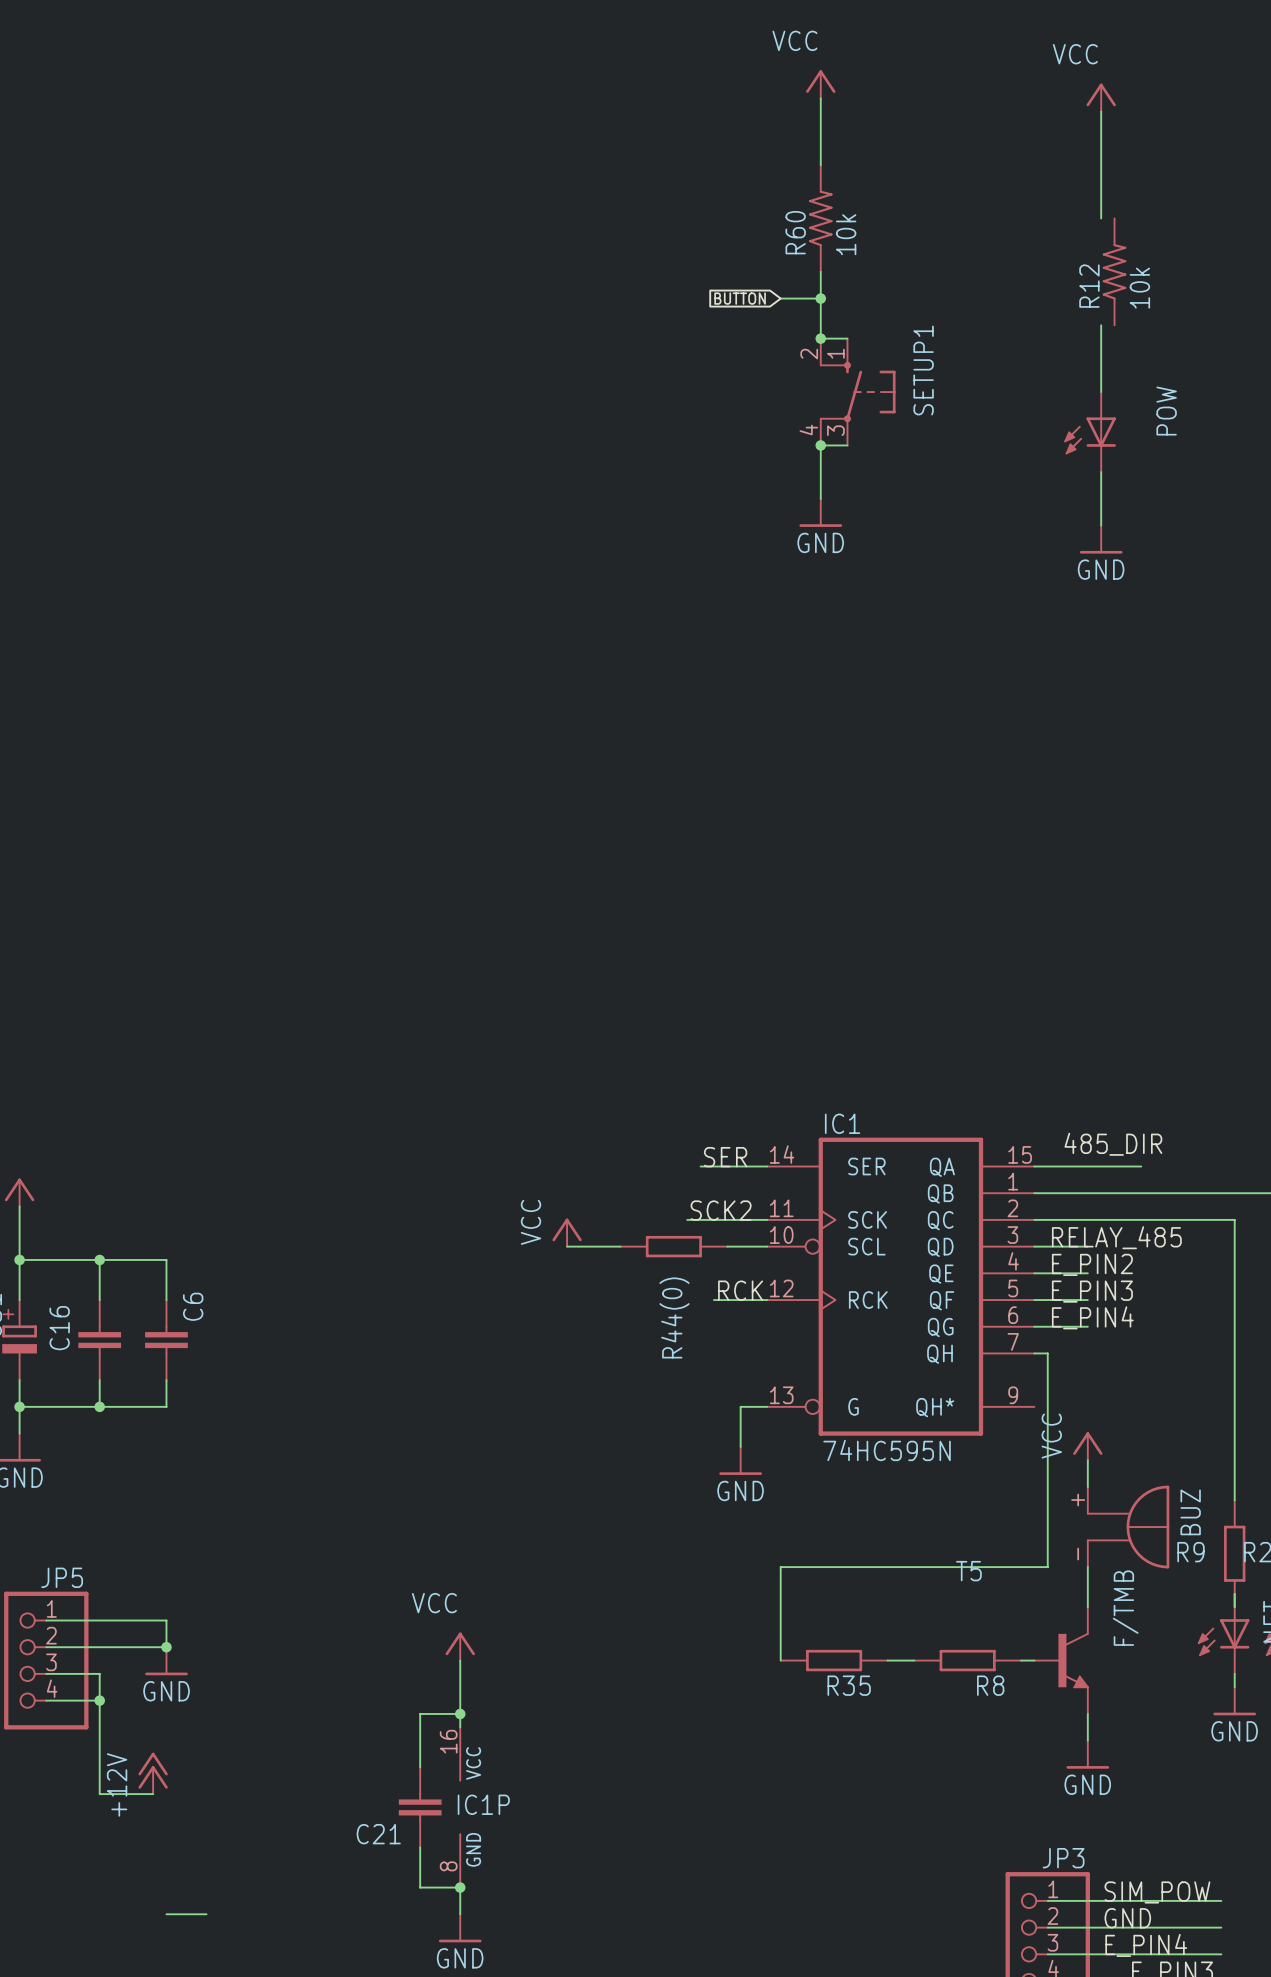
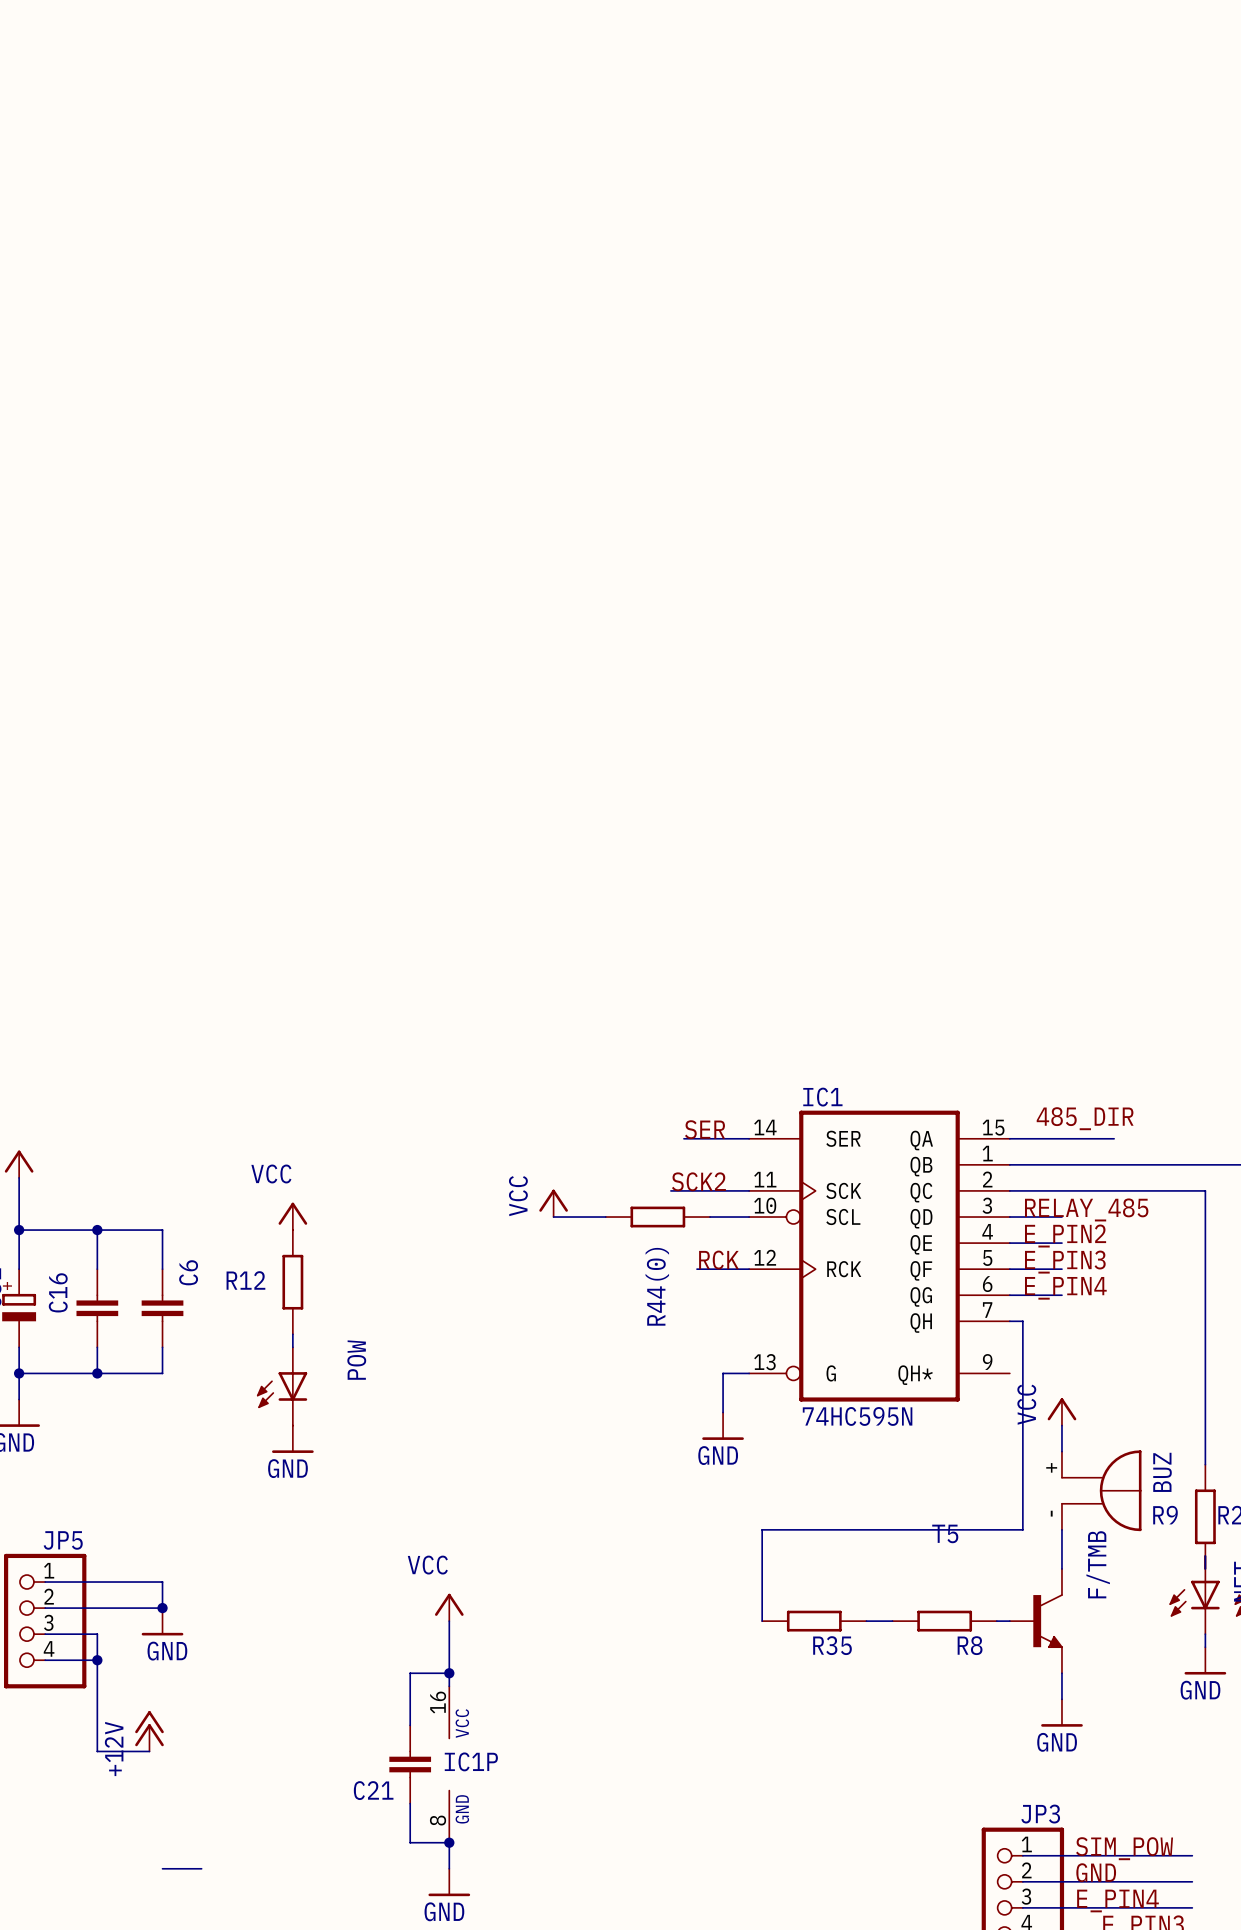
power symbol: VCC (820, 84) -> none
power symbol: VCC (1101, 97) -> none
wire: (820, 98) (820, 165) -> none
wire: (1101, 111) (1101, 218) -> none
R60: 10k (820, 218) -> none
R12 symbol: [1102, 218, 1127, 326] -> [282, 1230, 304, 1335]
wire: (820, 271) (820, 338) (847, 338) -> none
R12 name position: R12 (1089, 286) -> R12 (245, 1280)
R12 value: 10k (1139, 288) -> none
global label: BUTTON (740, 298) -> none
wire: (780, 298) (820, 298) -> none
junction: (820, 298) -> none
wire: (1101, 325) (1101, 392) -> none
junction: (820, 338) -> none
SETUP1: (857, 392) -> none
POW: (1090, 432) -> none
junction: (820, 445) -> none
wire: (847, 445) (820, 445) (820, 498) -> none
wire: (1101, 472) (1101, 525) -> none
power symbol: GND (820, 512) -> none
power symbol: GND (1101, 539) -> none
power symbol: none -> VCC (292, 1216)
wire: none -> (292, 1334) (292, 1347)
POW: none -> (282, 1386)
power symbol: none -> GND (292, 1439)

